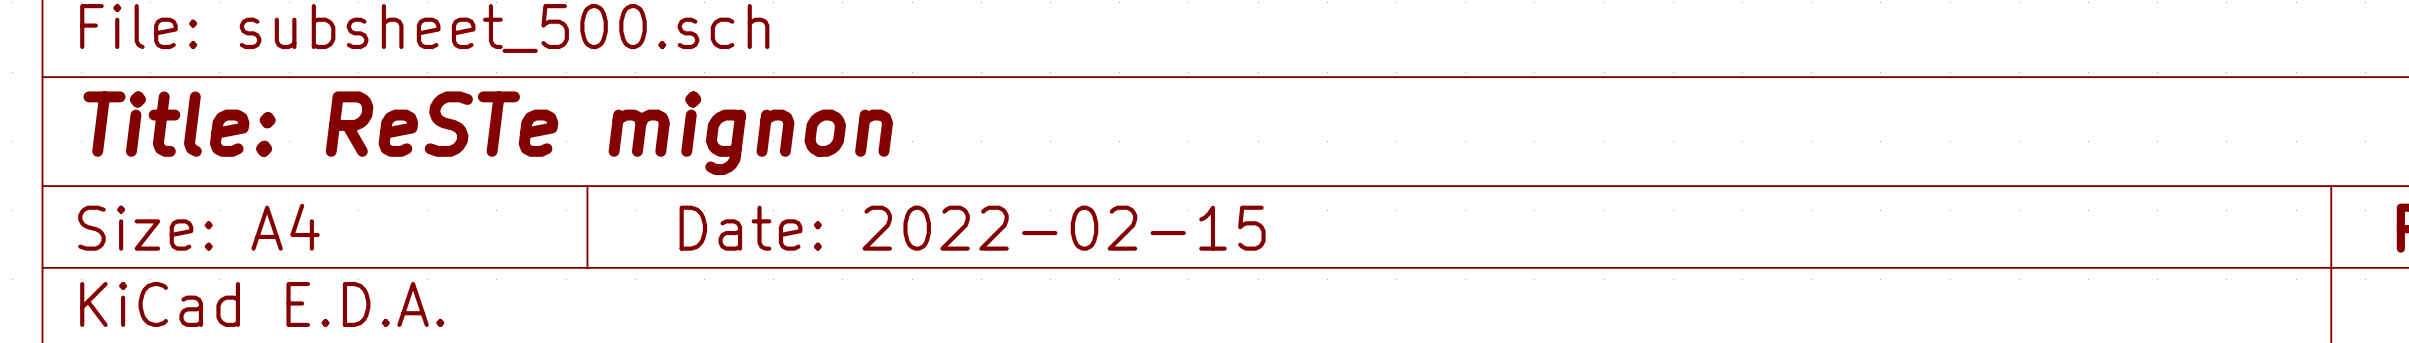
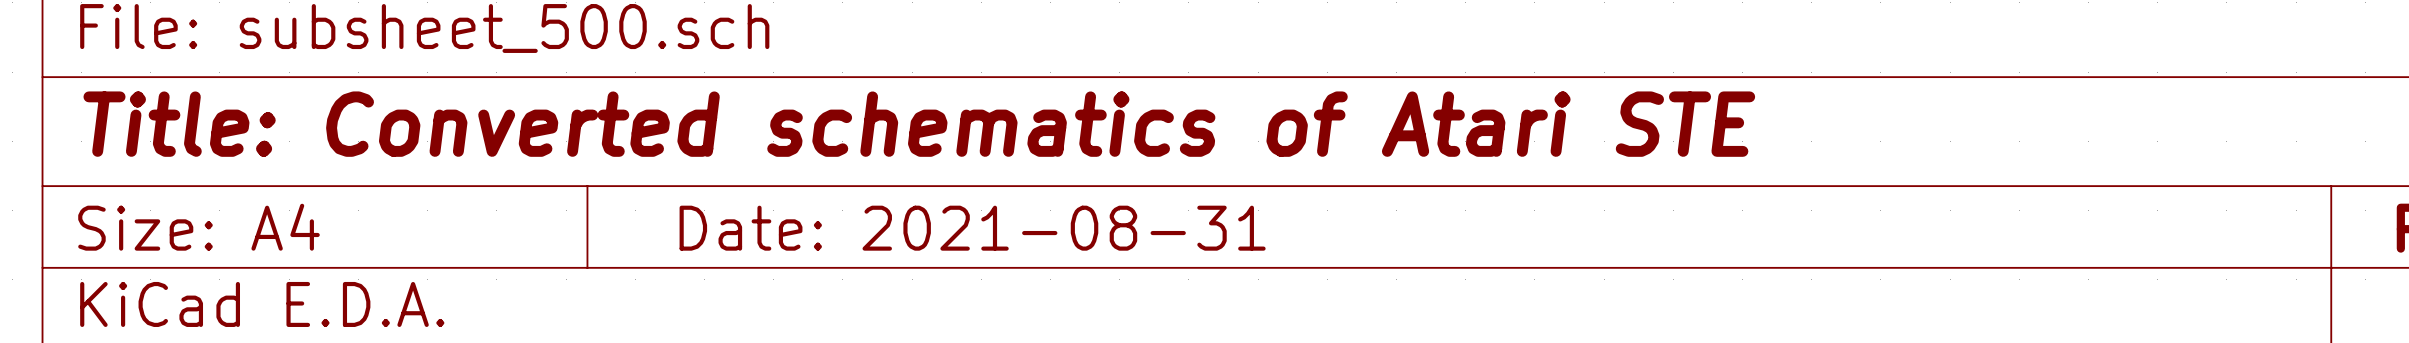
title block: Title: ReSTe mignon (488, 133) -> Title: Converted schematics of Atari STE (919, 124)
title block: Date: 2022-02-15 (972, 228) -> Date: 2021-08-31 (972, 228)

